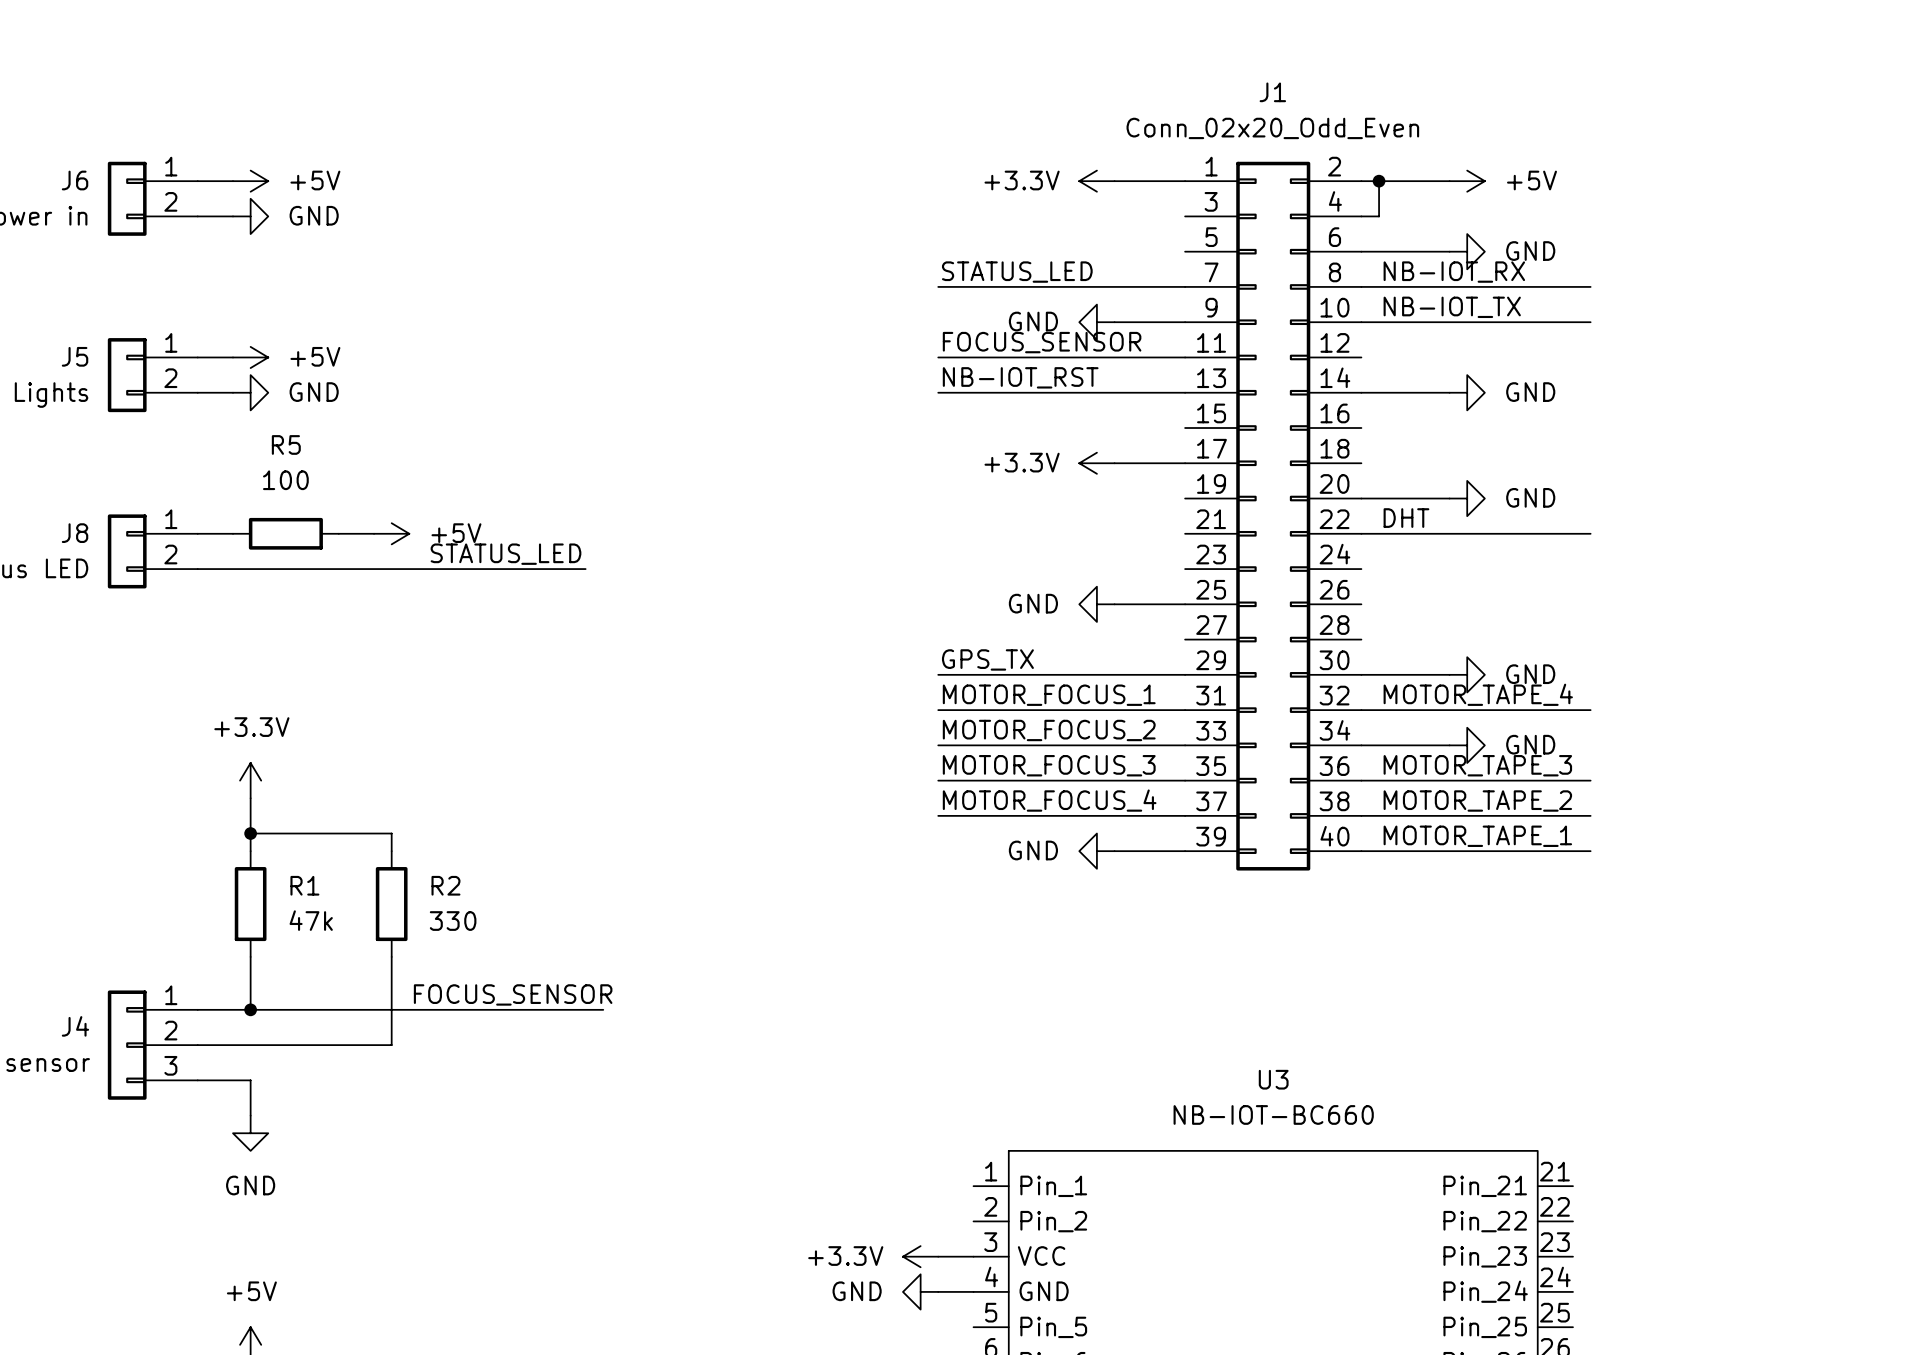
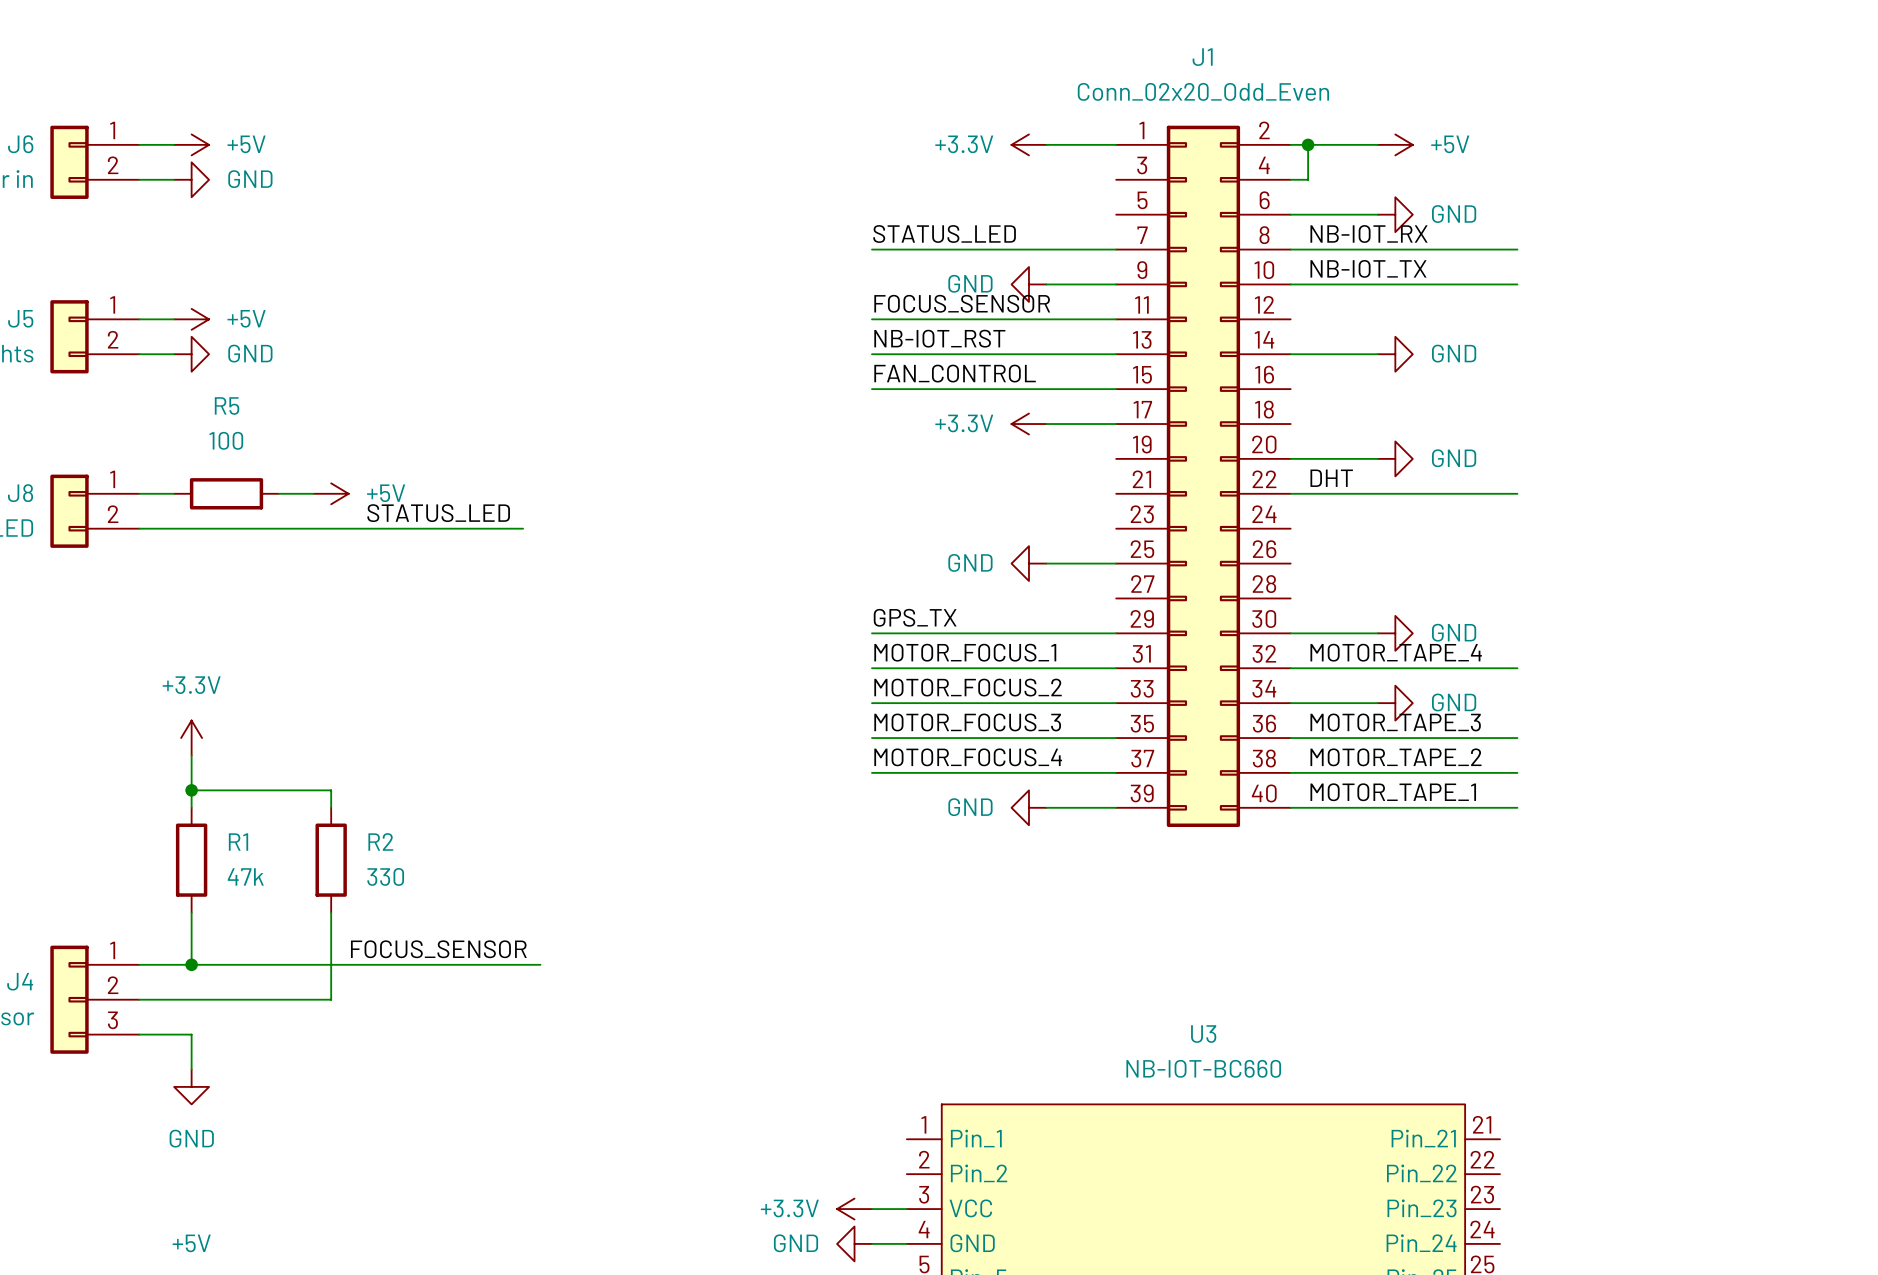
label: none -> FAN_CONTROL (955, 373)
wire: none -> (871, 389) (1116, 389)

